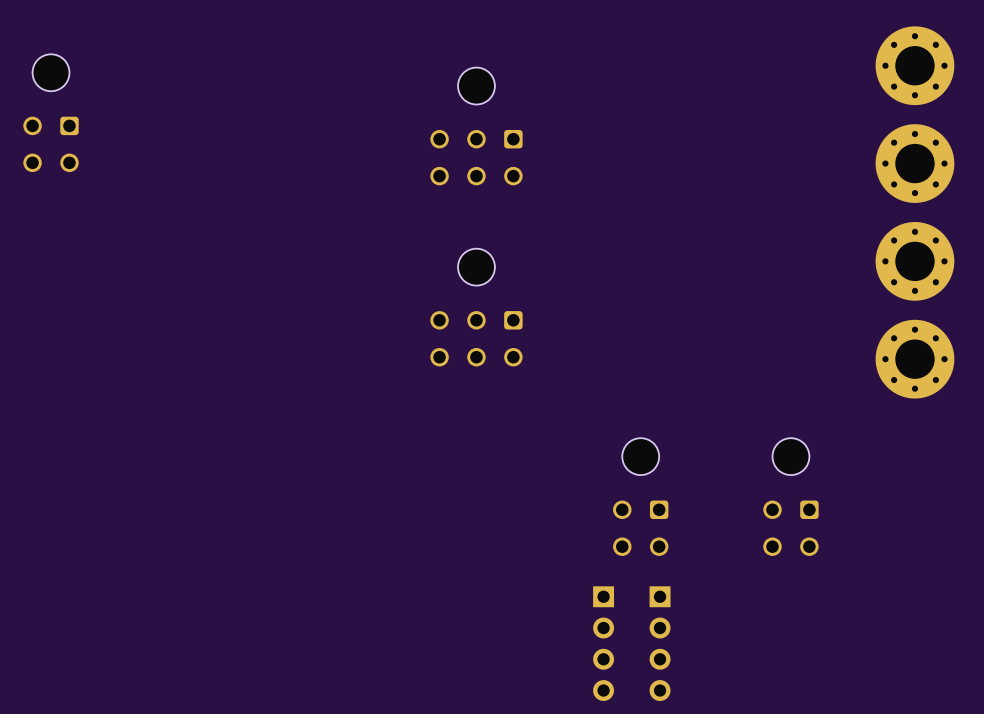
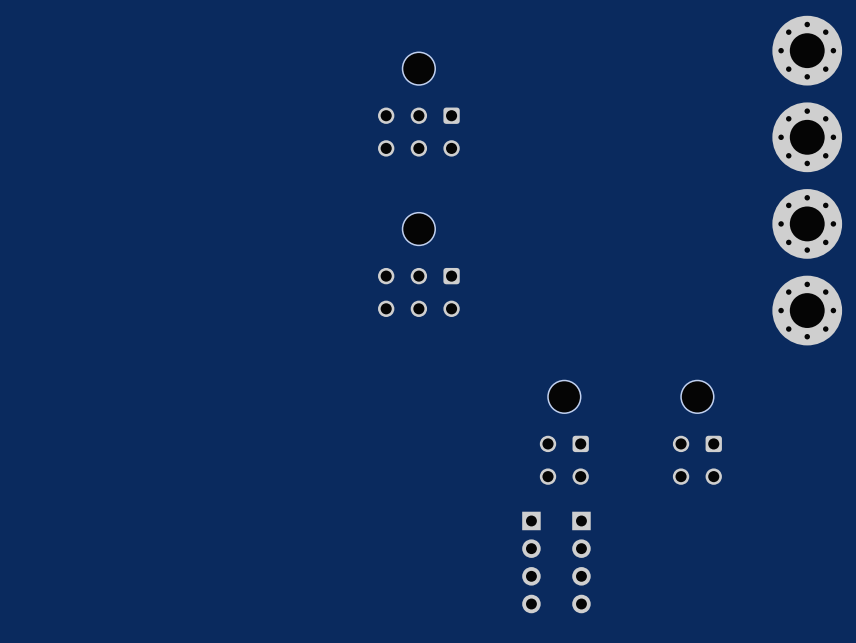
part: (51, 113) -> none

